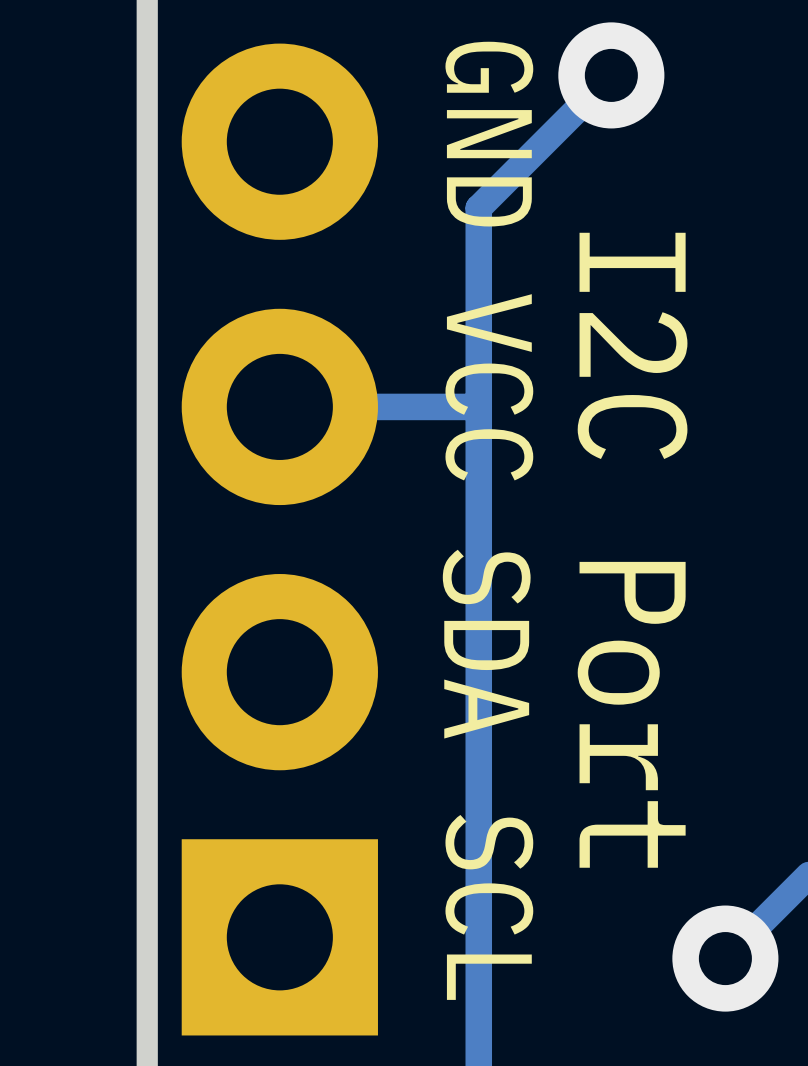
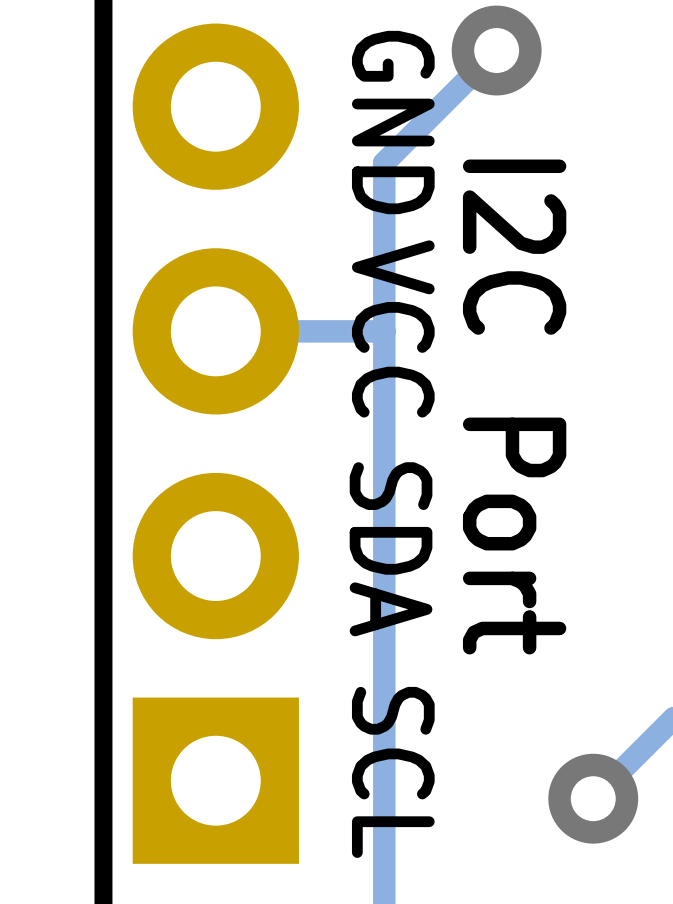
text position: I2C Port (632, 550) -> I2C Port (514, 406)

